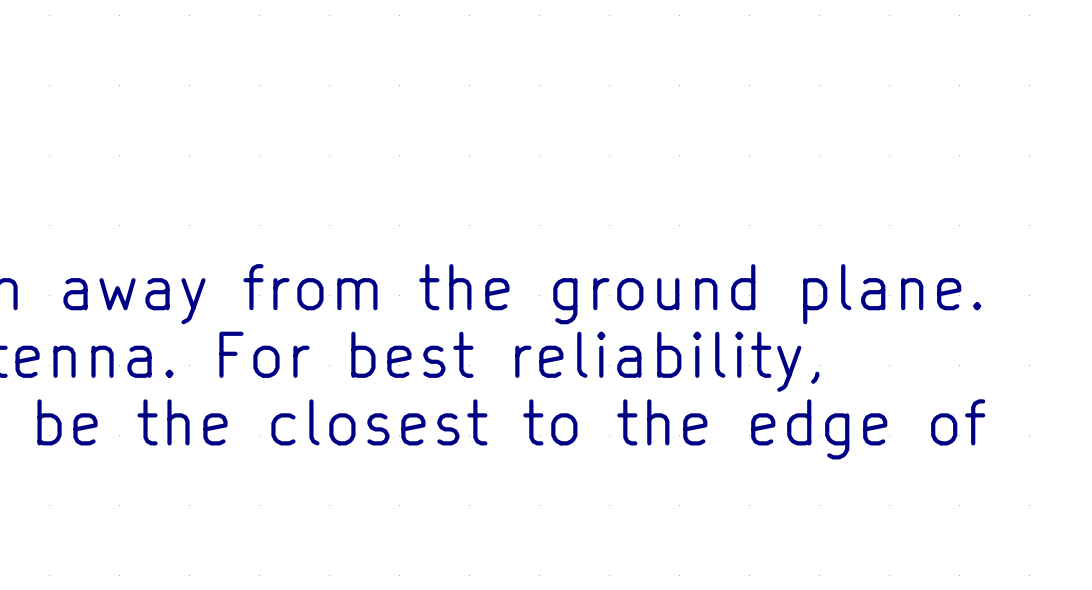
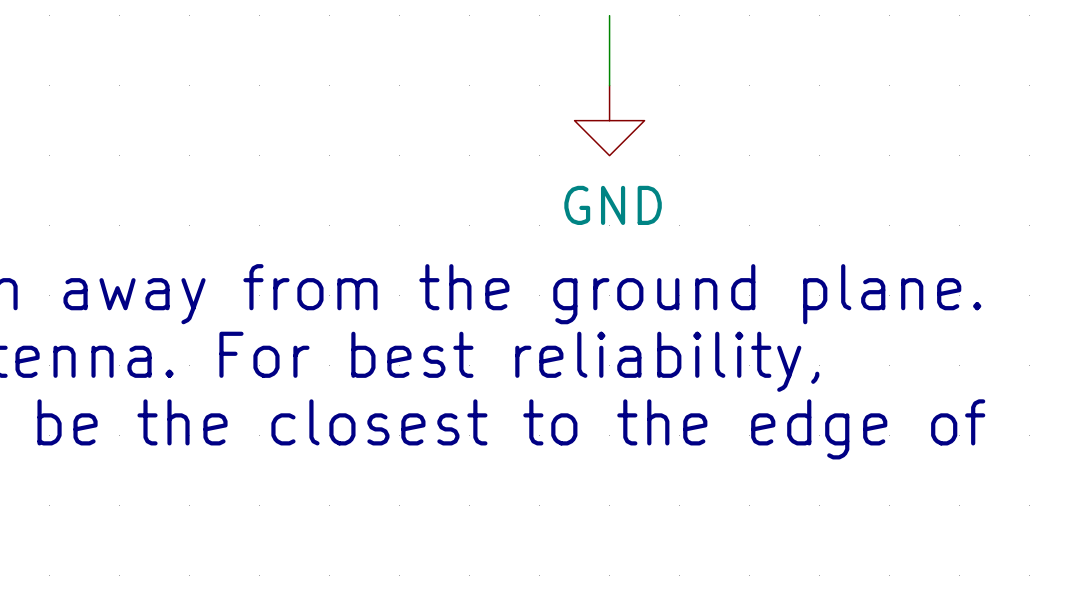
wire: none -> (609, 15) (609, 85)
power symbol: none -> GND (609, 120)

